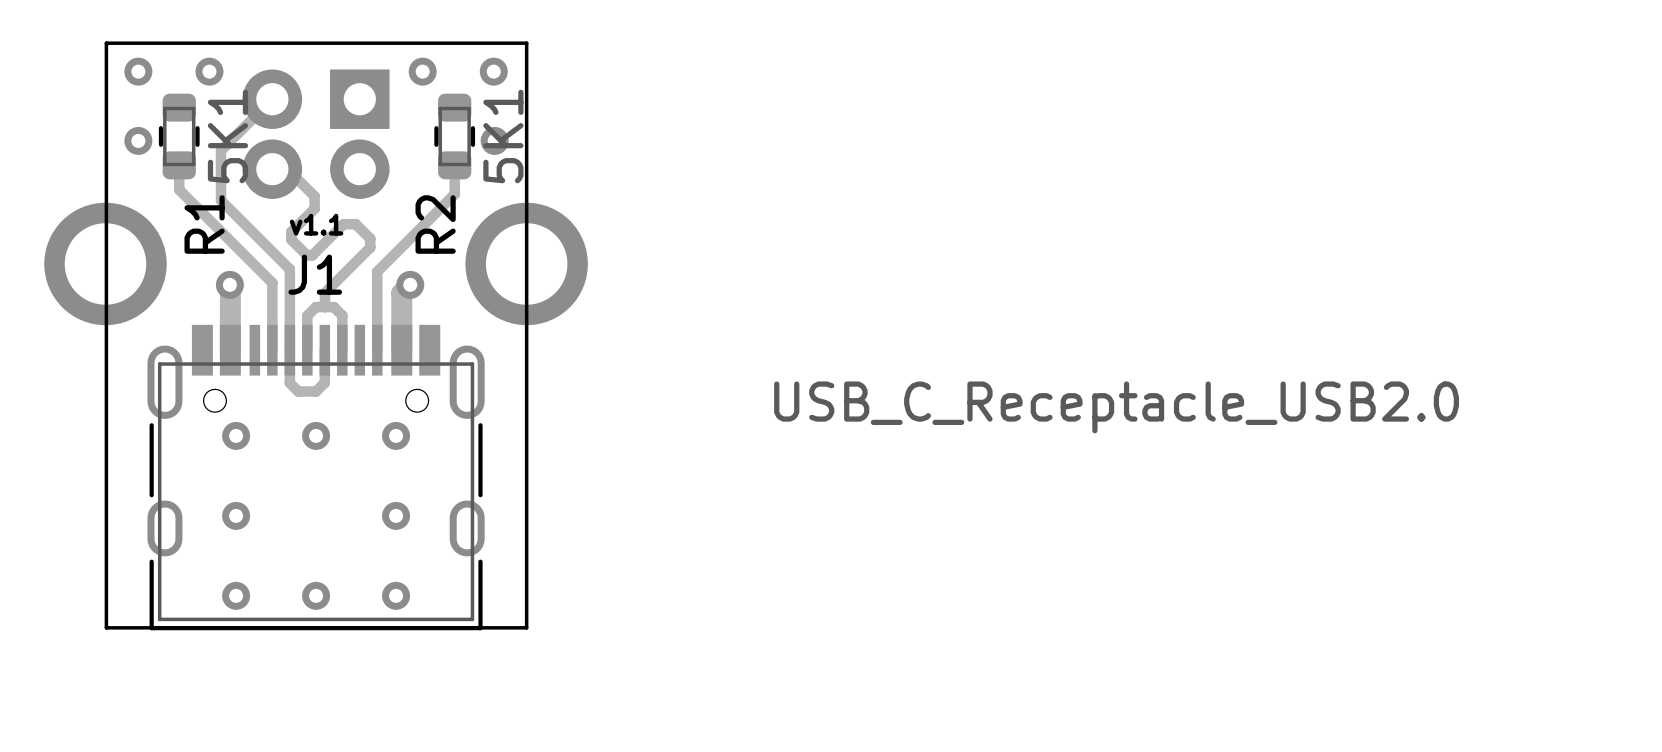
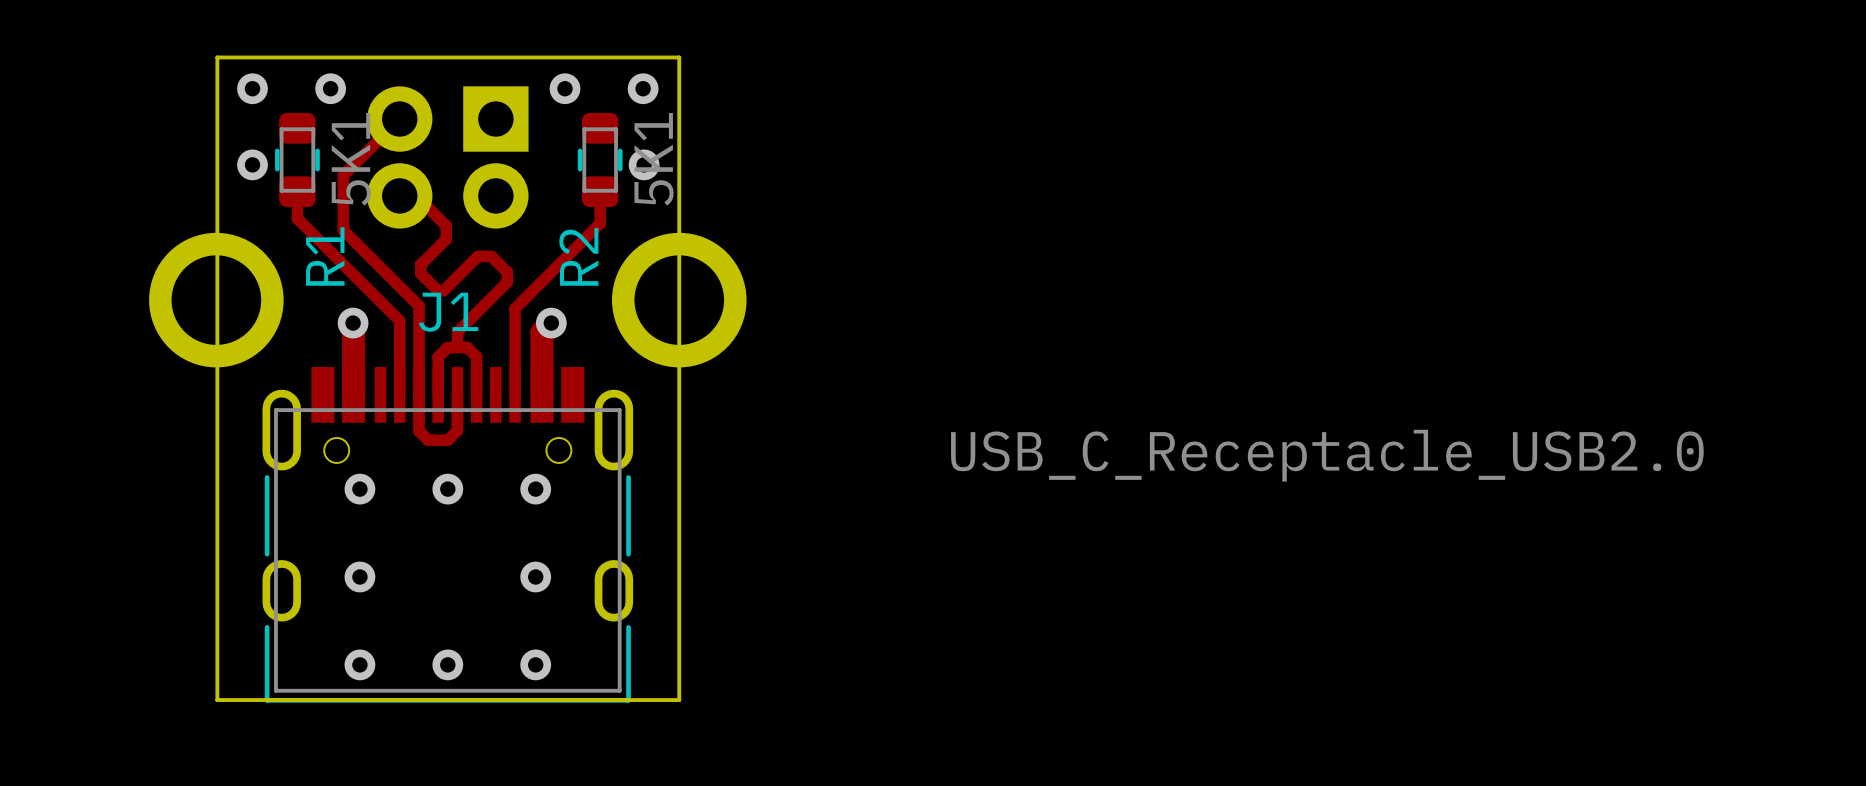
text: v1.1 (316, 224) -> none

